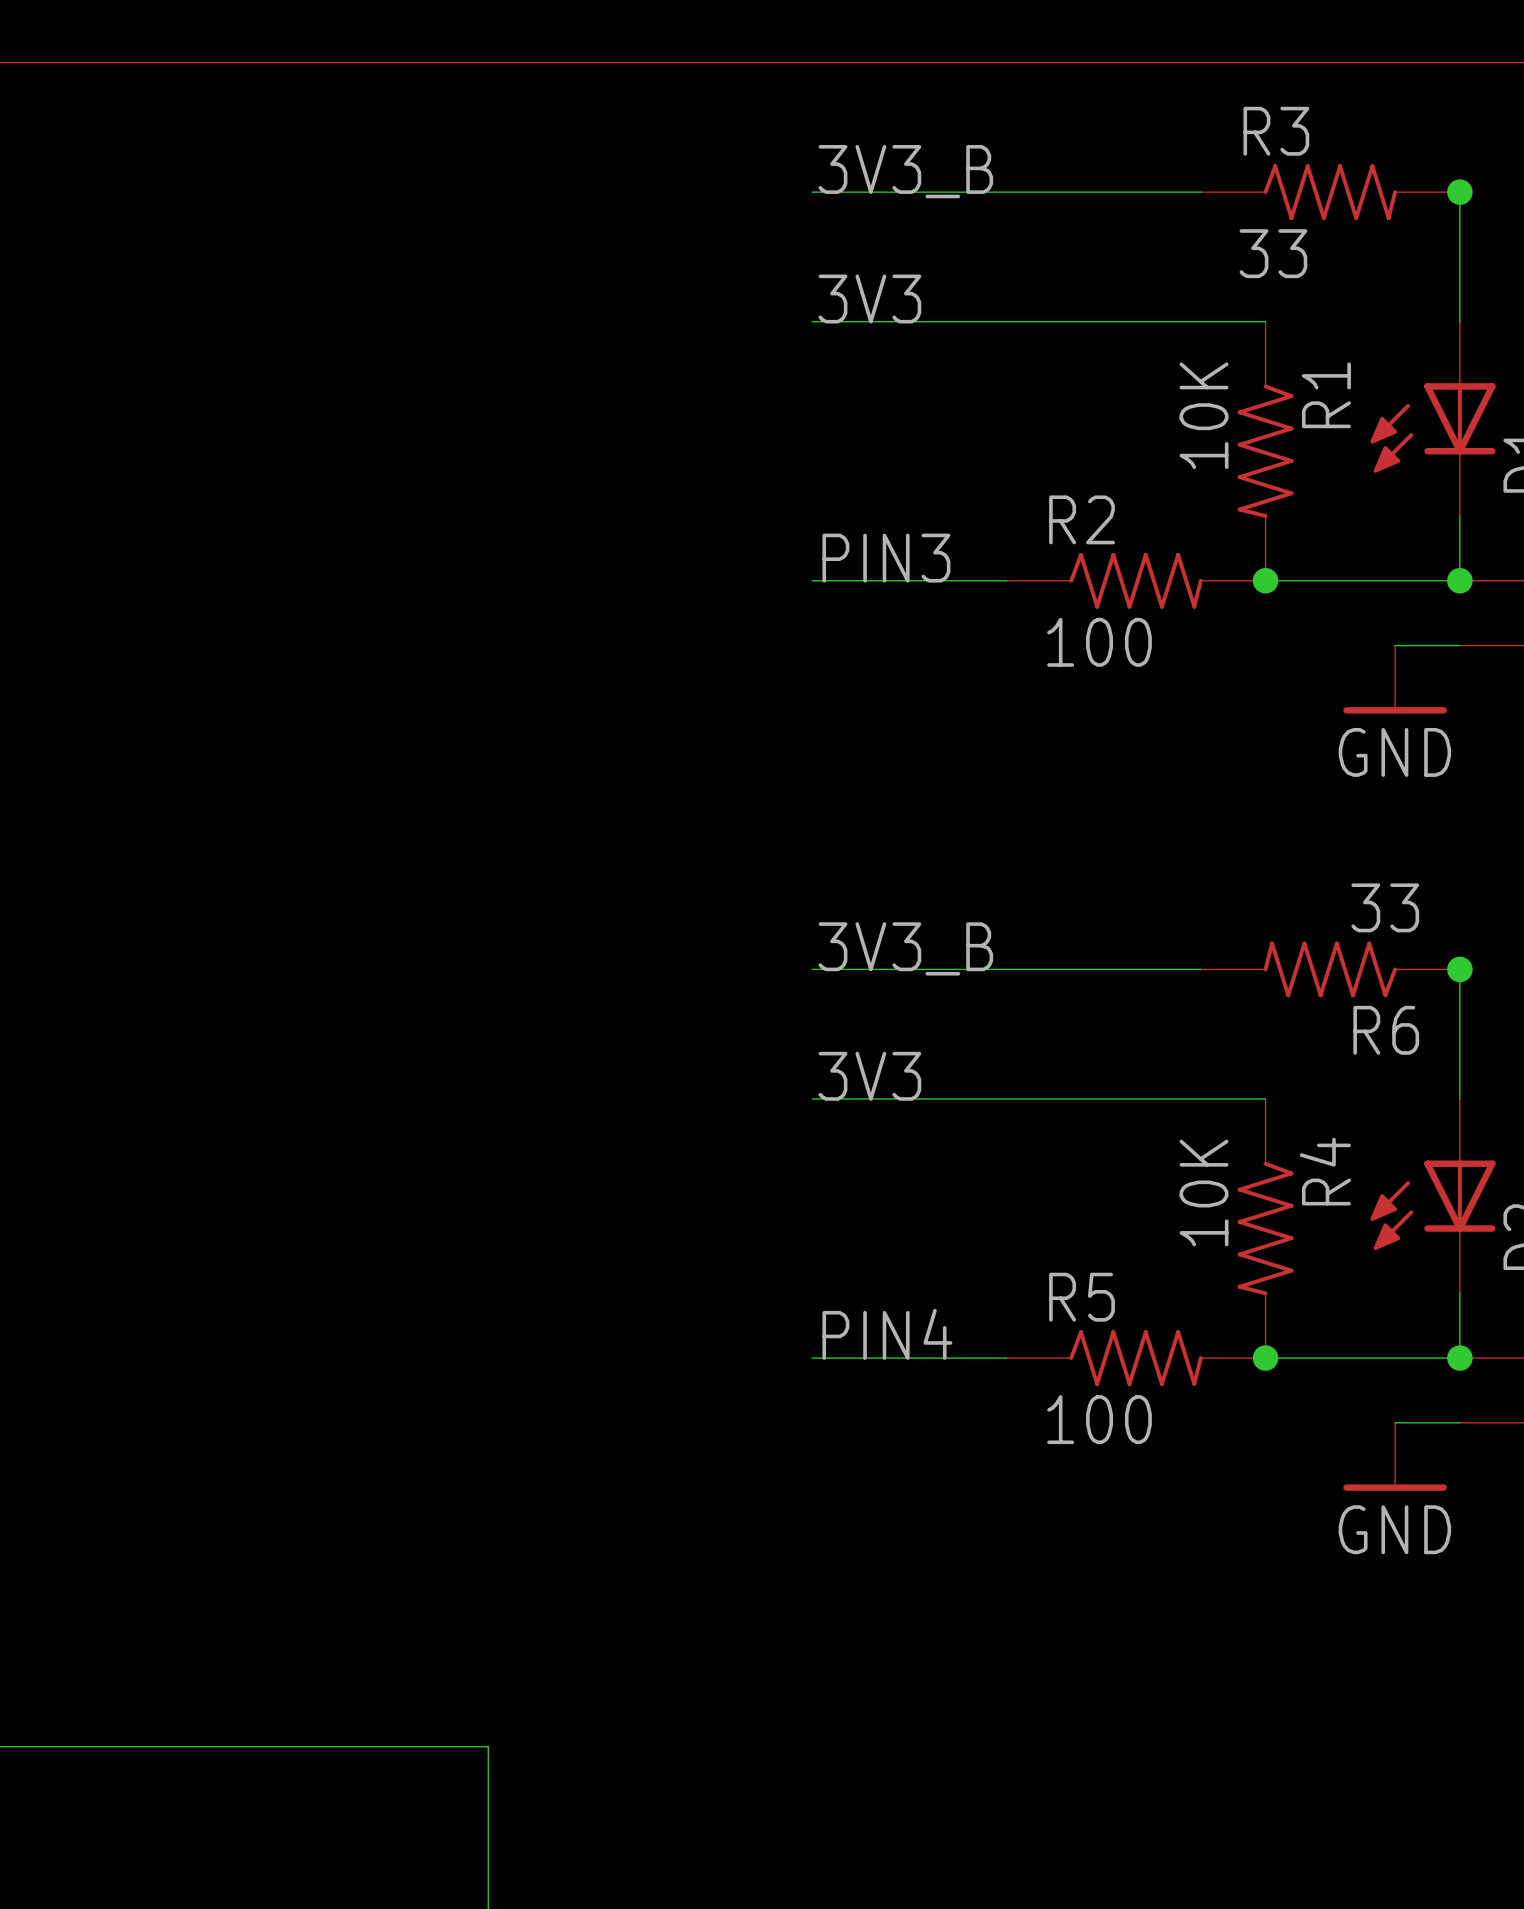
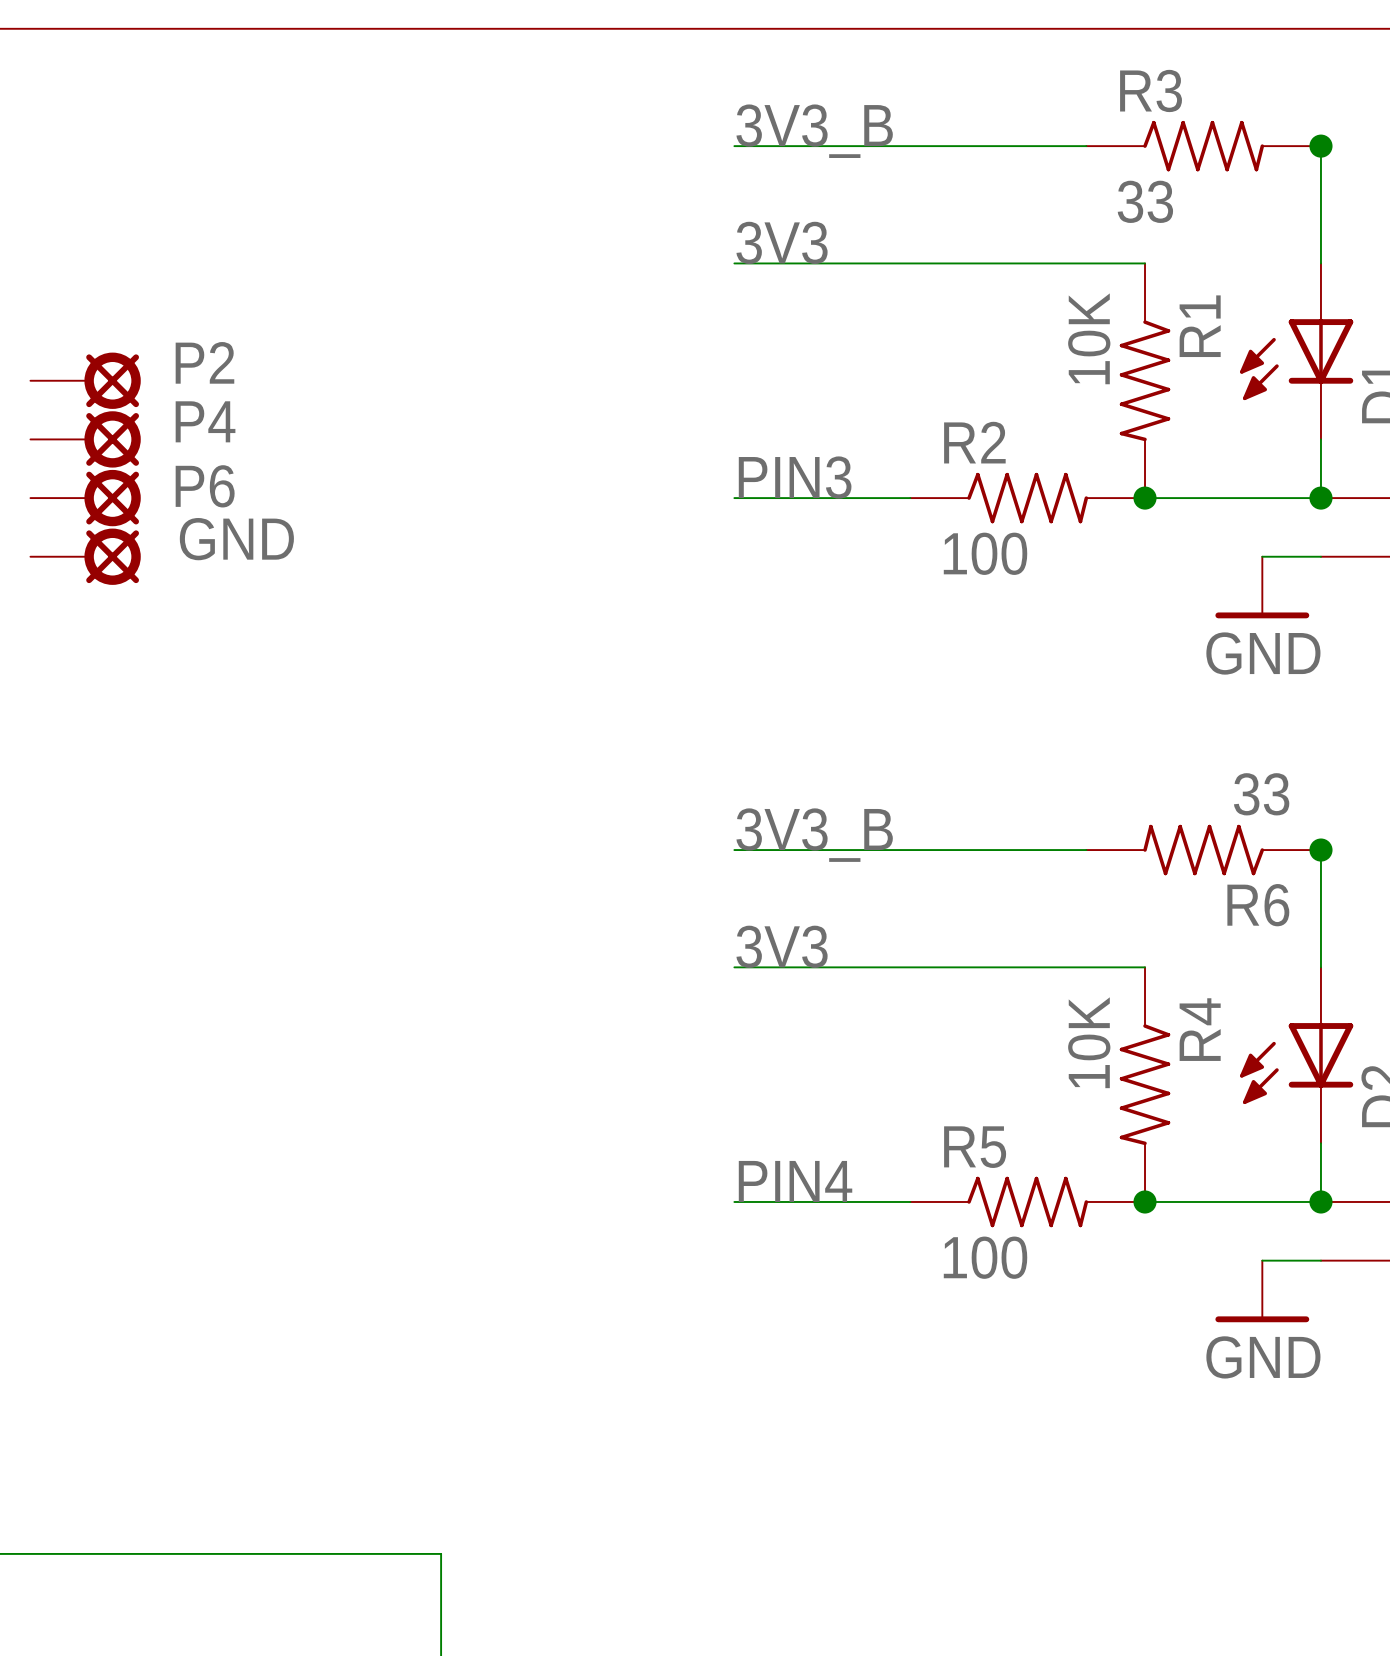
P2: none -> (85, 380)
P4: none -> (85, 439)
P6: none -> (85, 498)
GND: none -> (85, 556)

